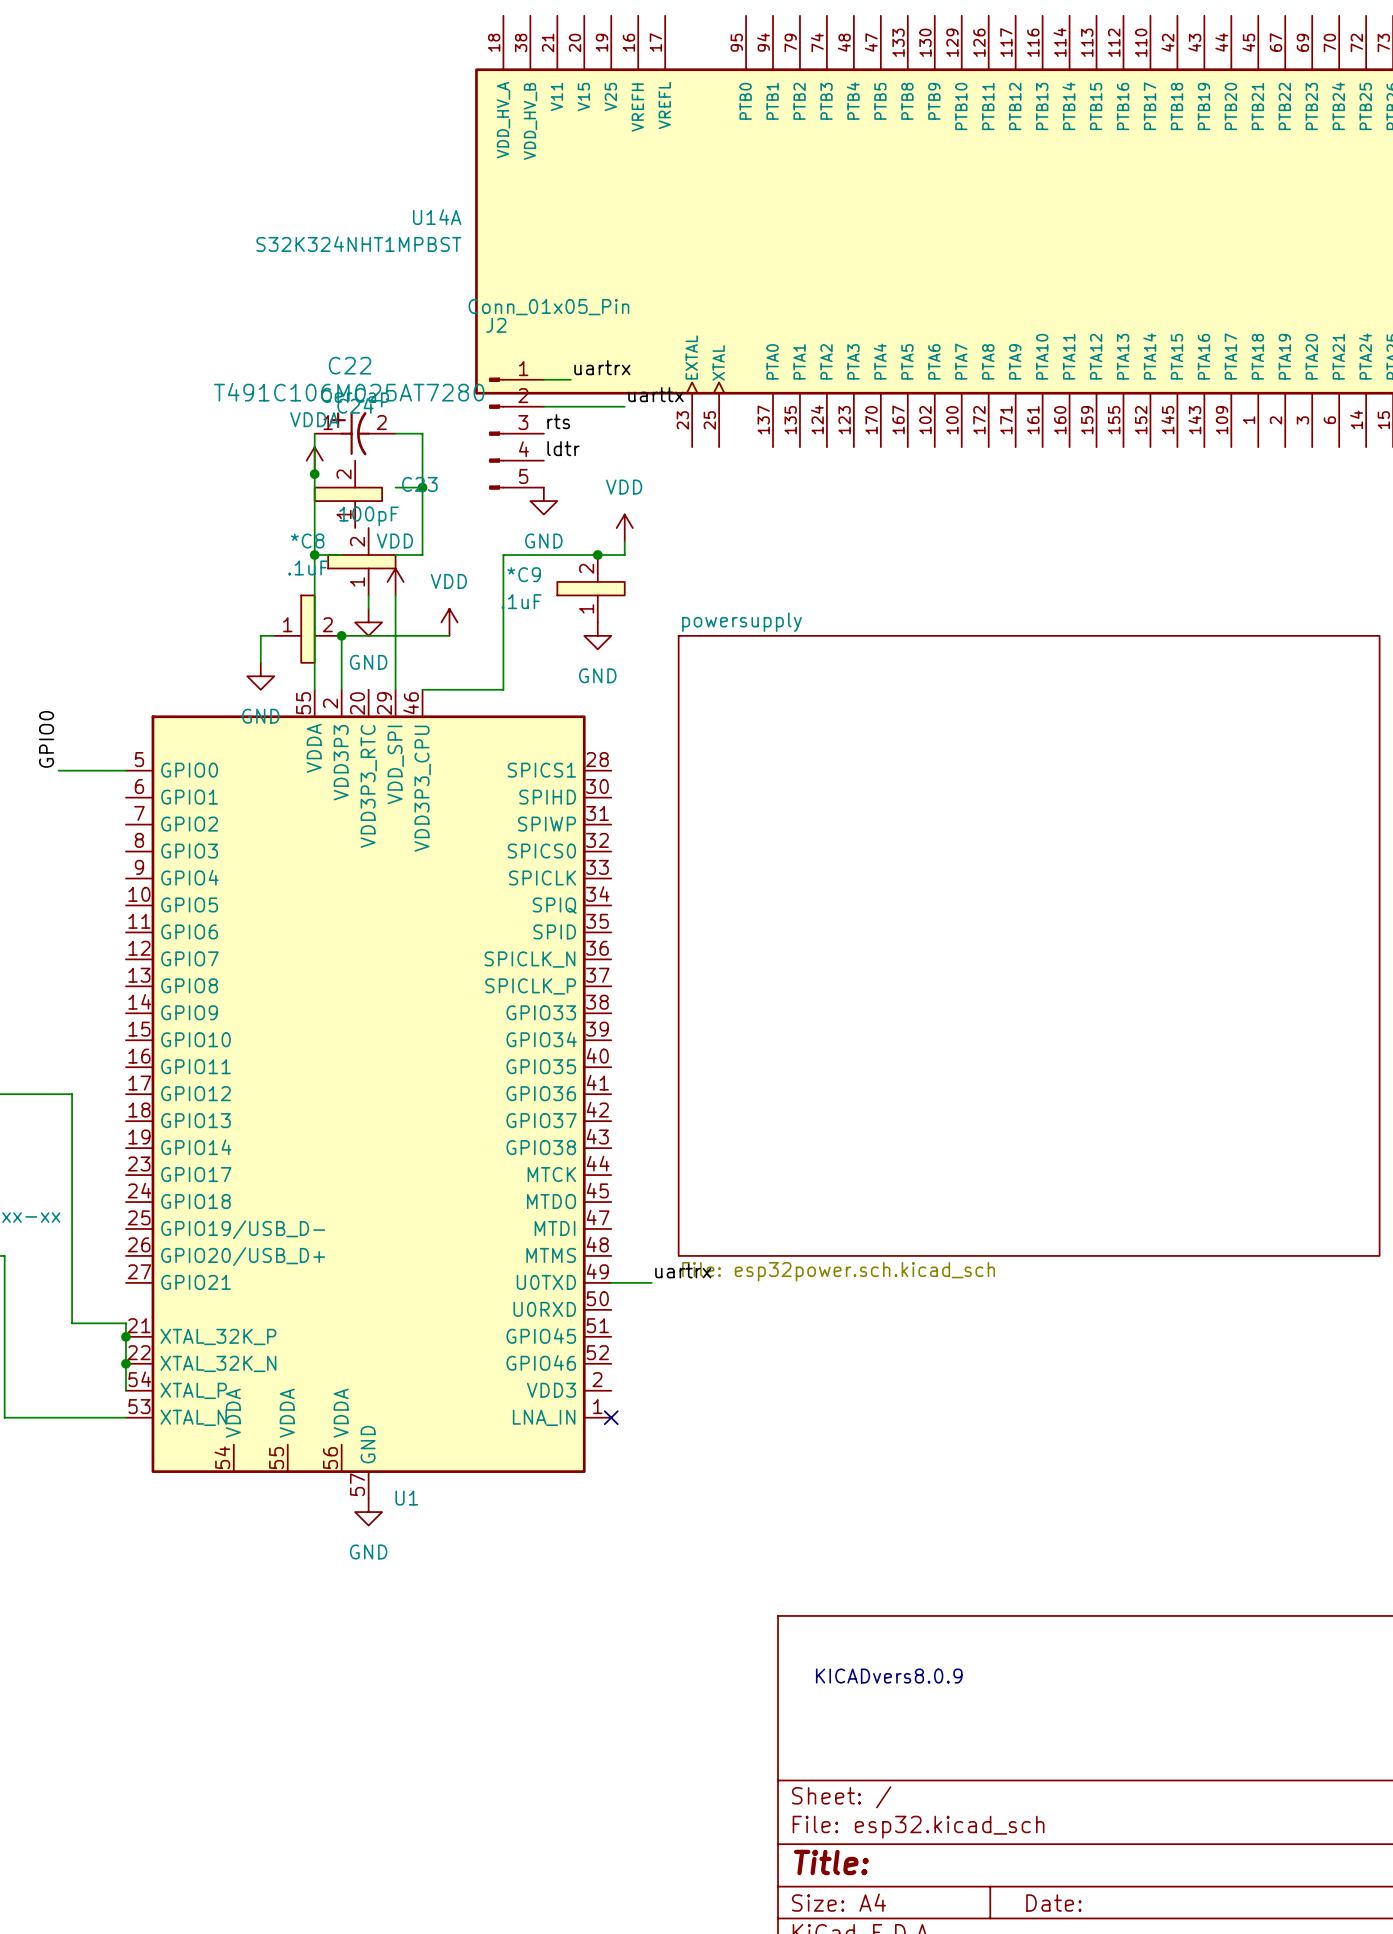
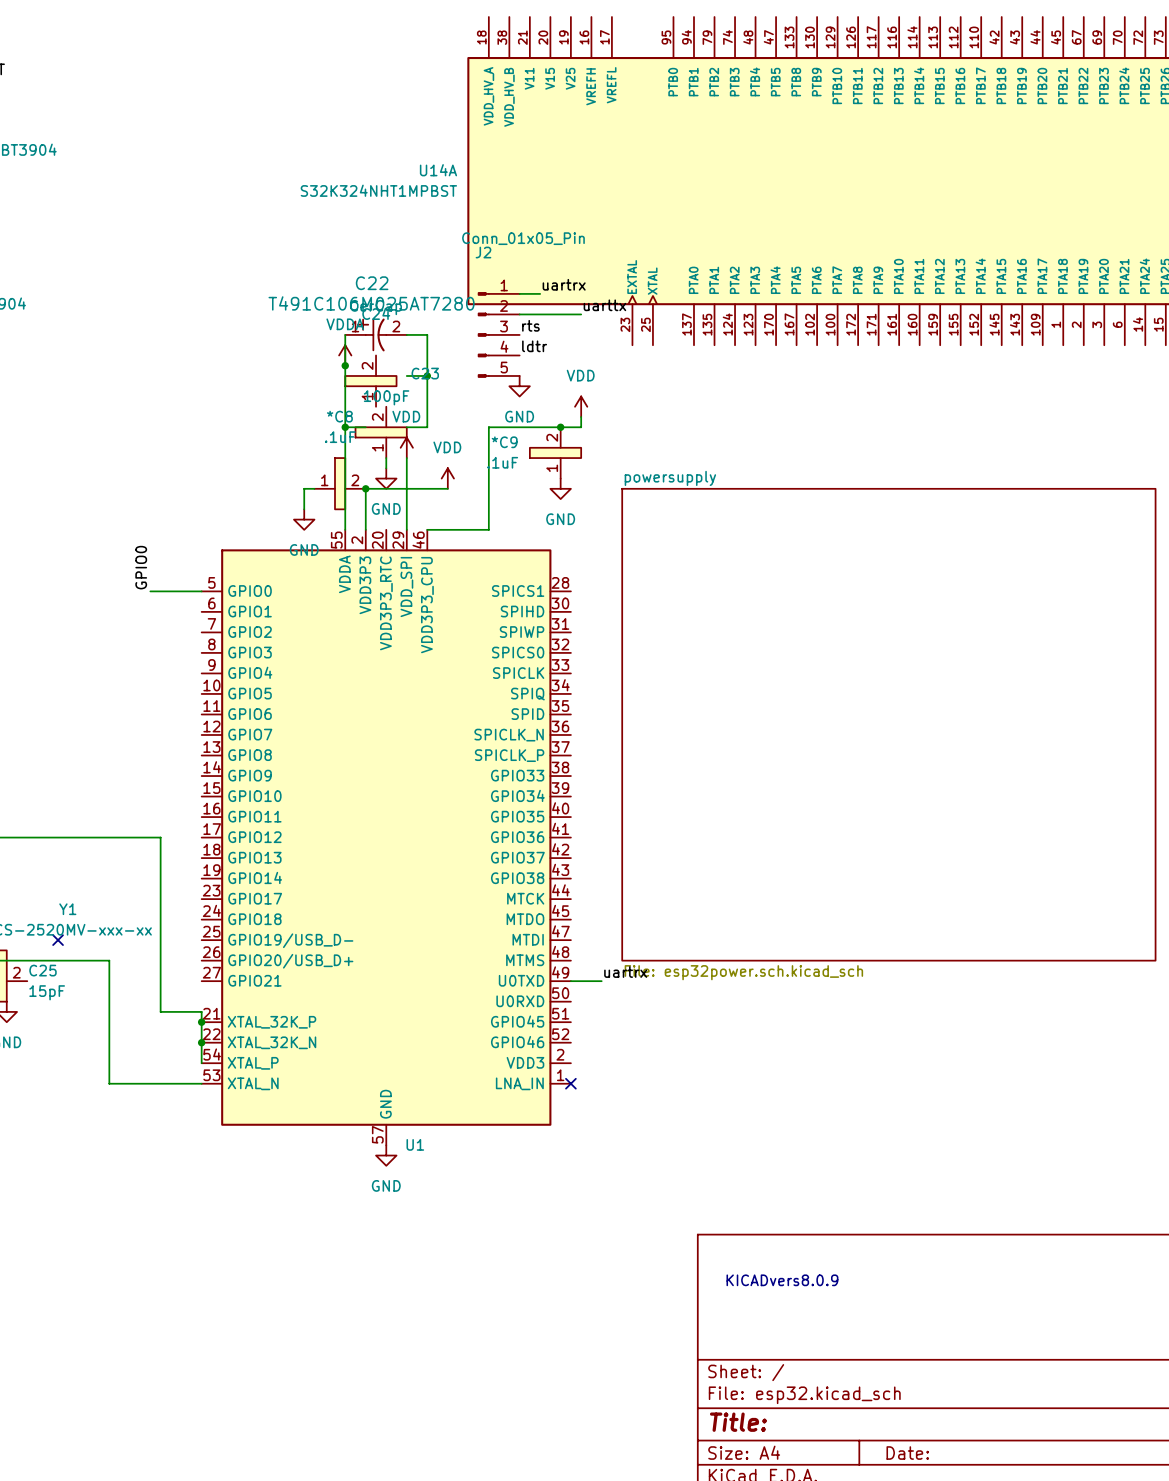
U1 symbol: [125, 689, 612, 1499] -> [201, 529, 571, 1146]

